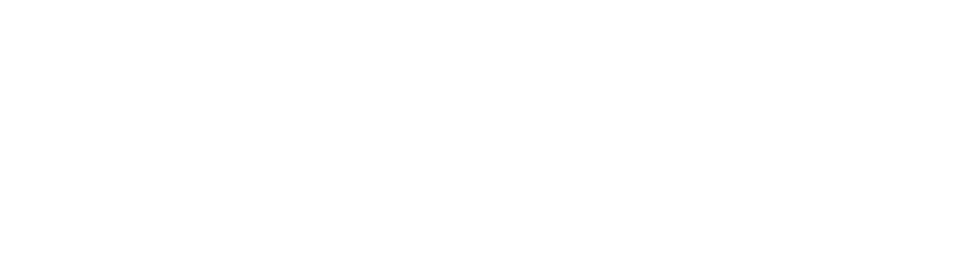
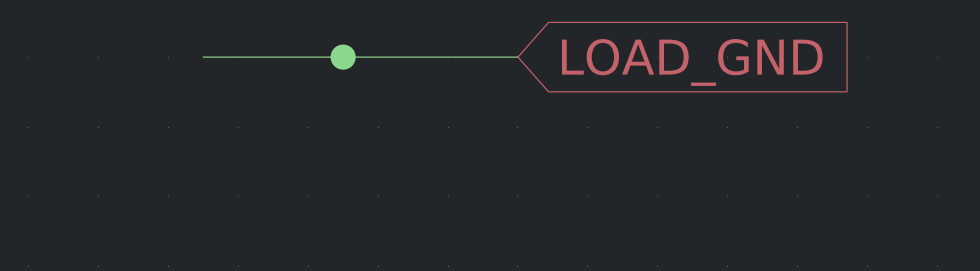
wire: none -> (203, 57) (517, 57)
junction: none -> (343, 57)
global label: none -> LOAD_GND (692, 62)

